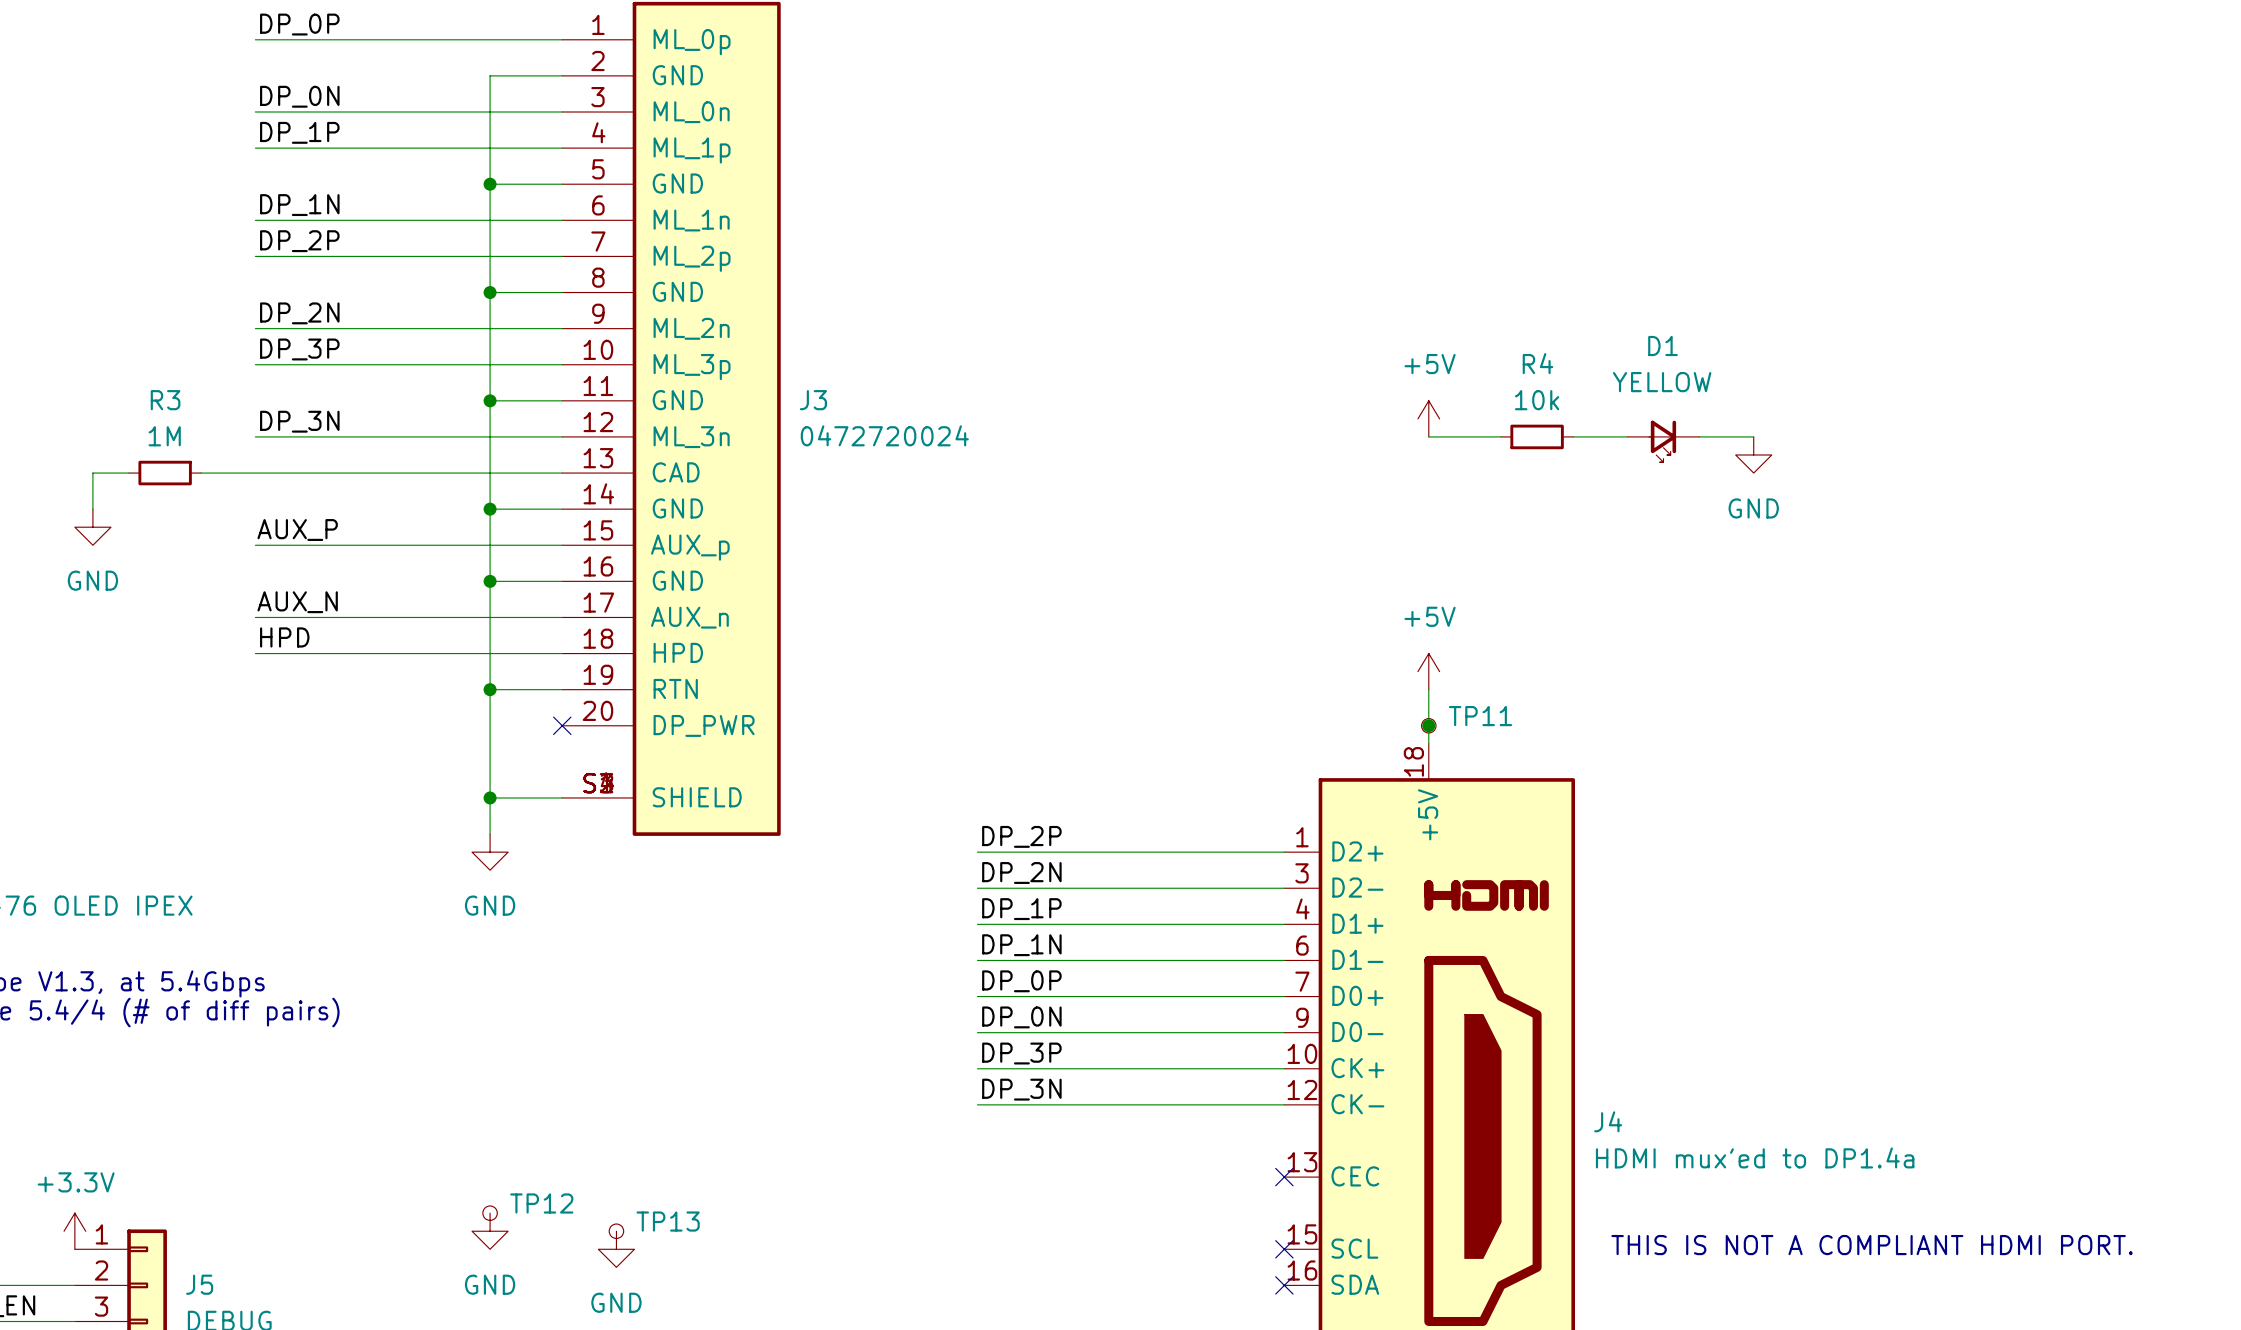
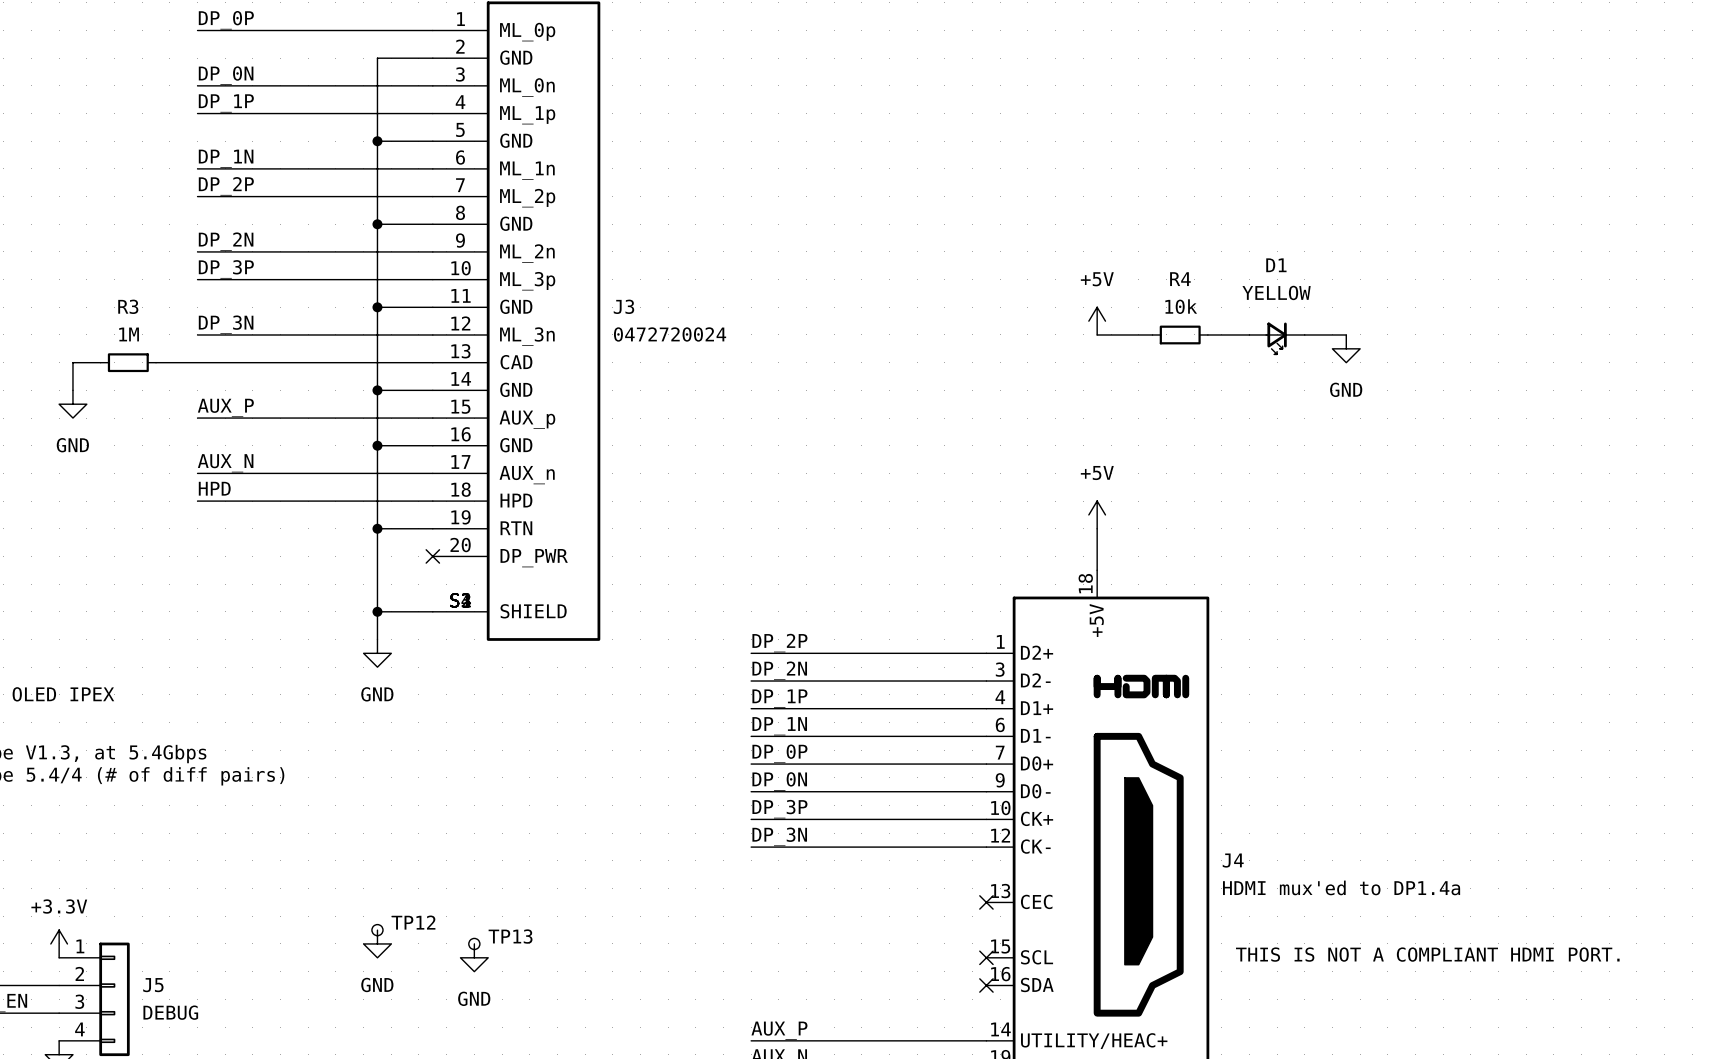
junction: (1428, 725) -> none
TP11: (1428, 725) -> none

